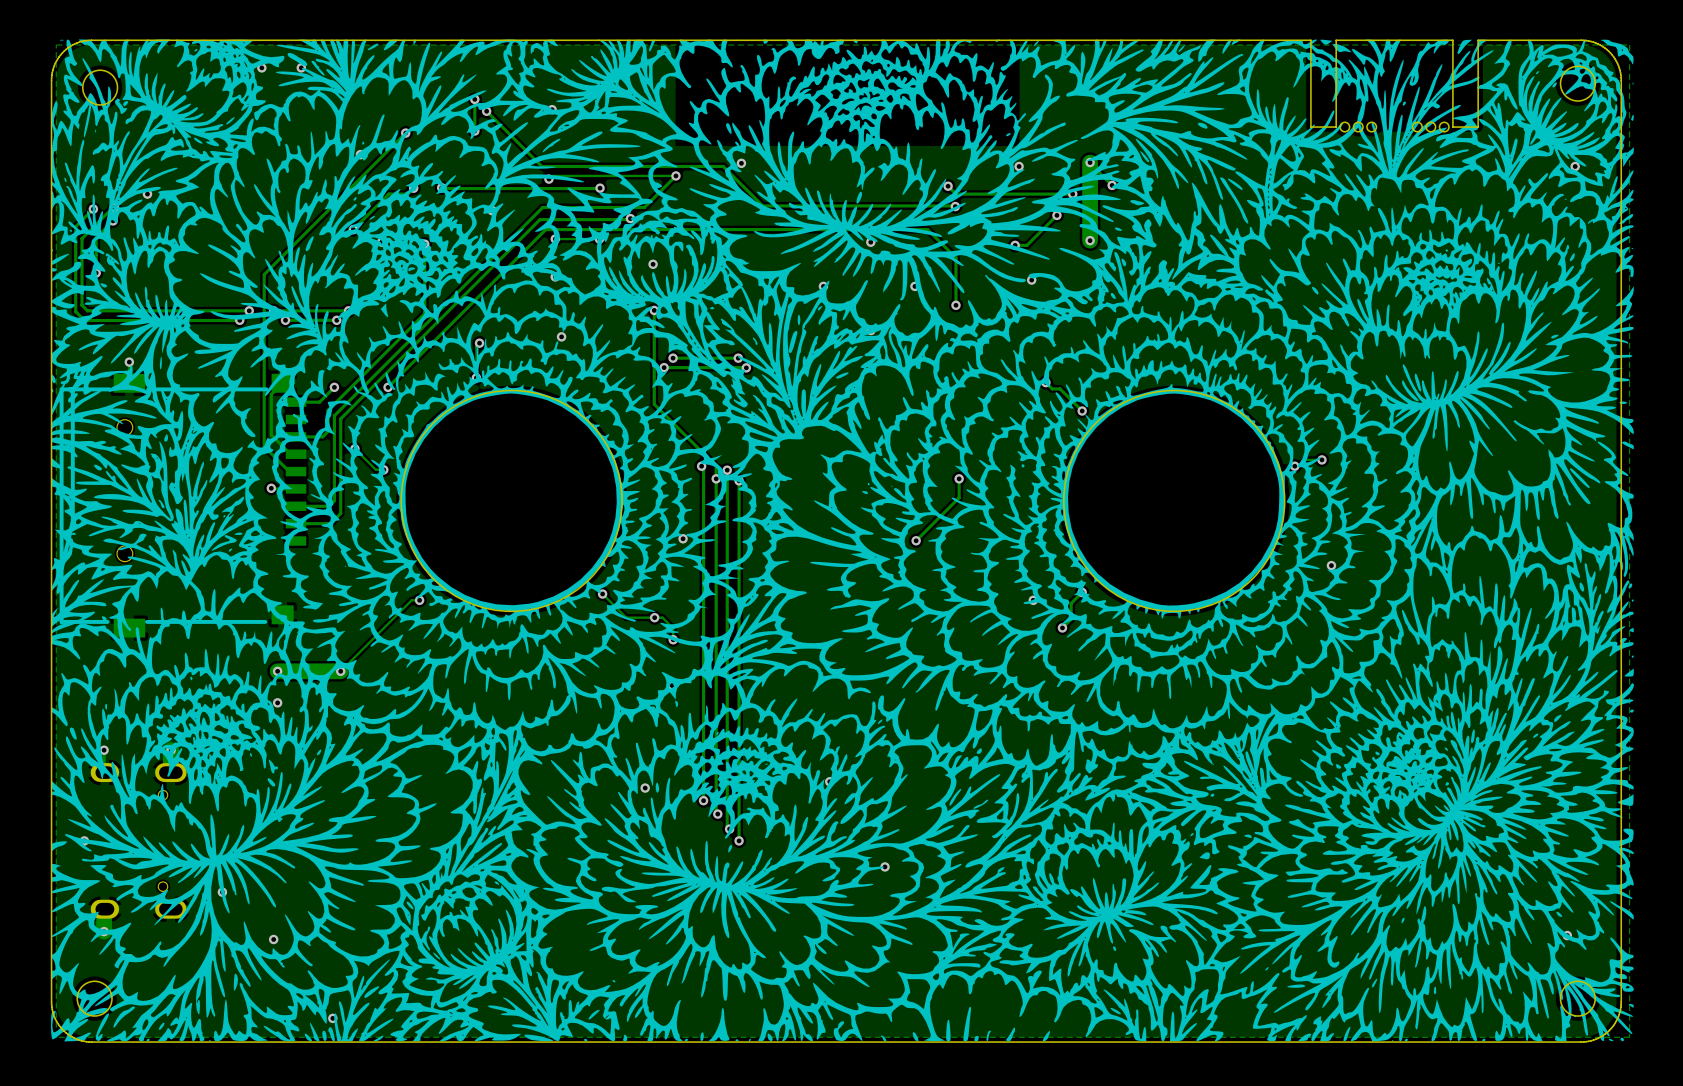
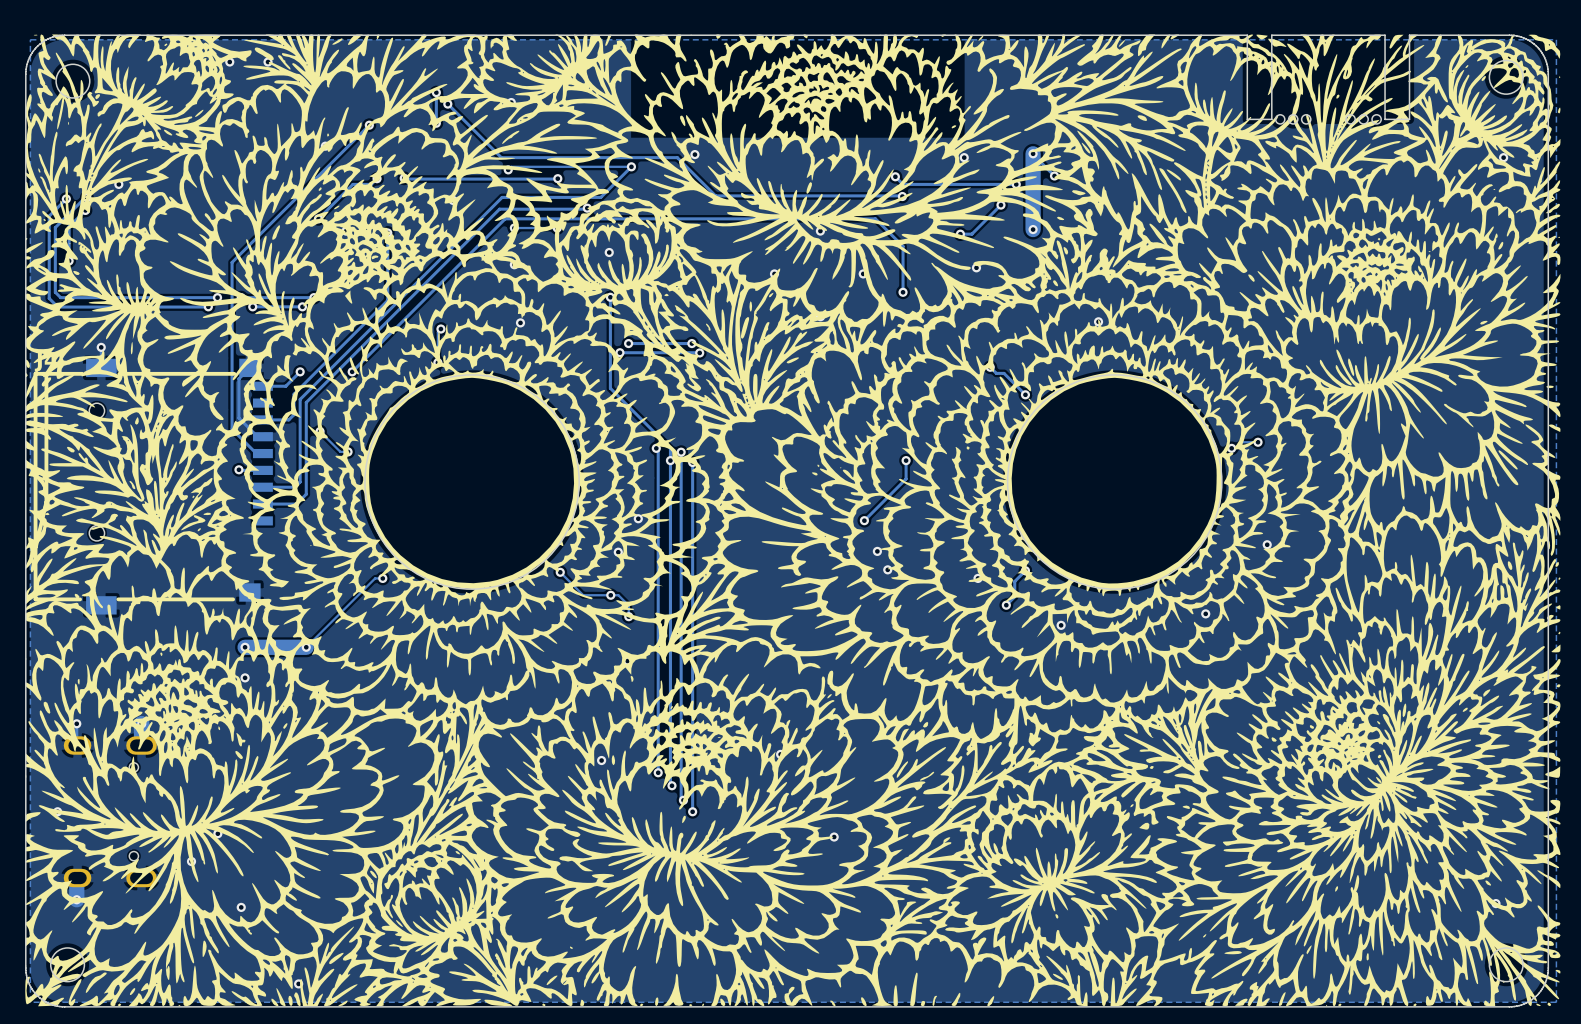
via: none -> (1098, 321)
via: none -> (877, 551)
via: none -> (618, 552)
via: none -> (887, 569)
via: none -> (1205, 613)
via: none -> (1061, 625)
via: none -> (217, 833)

